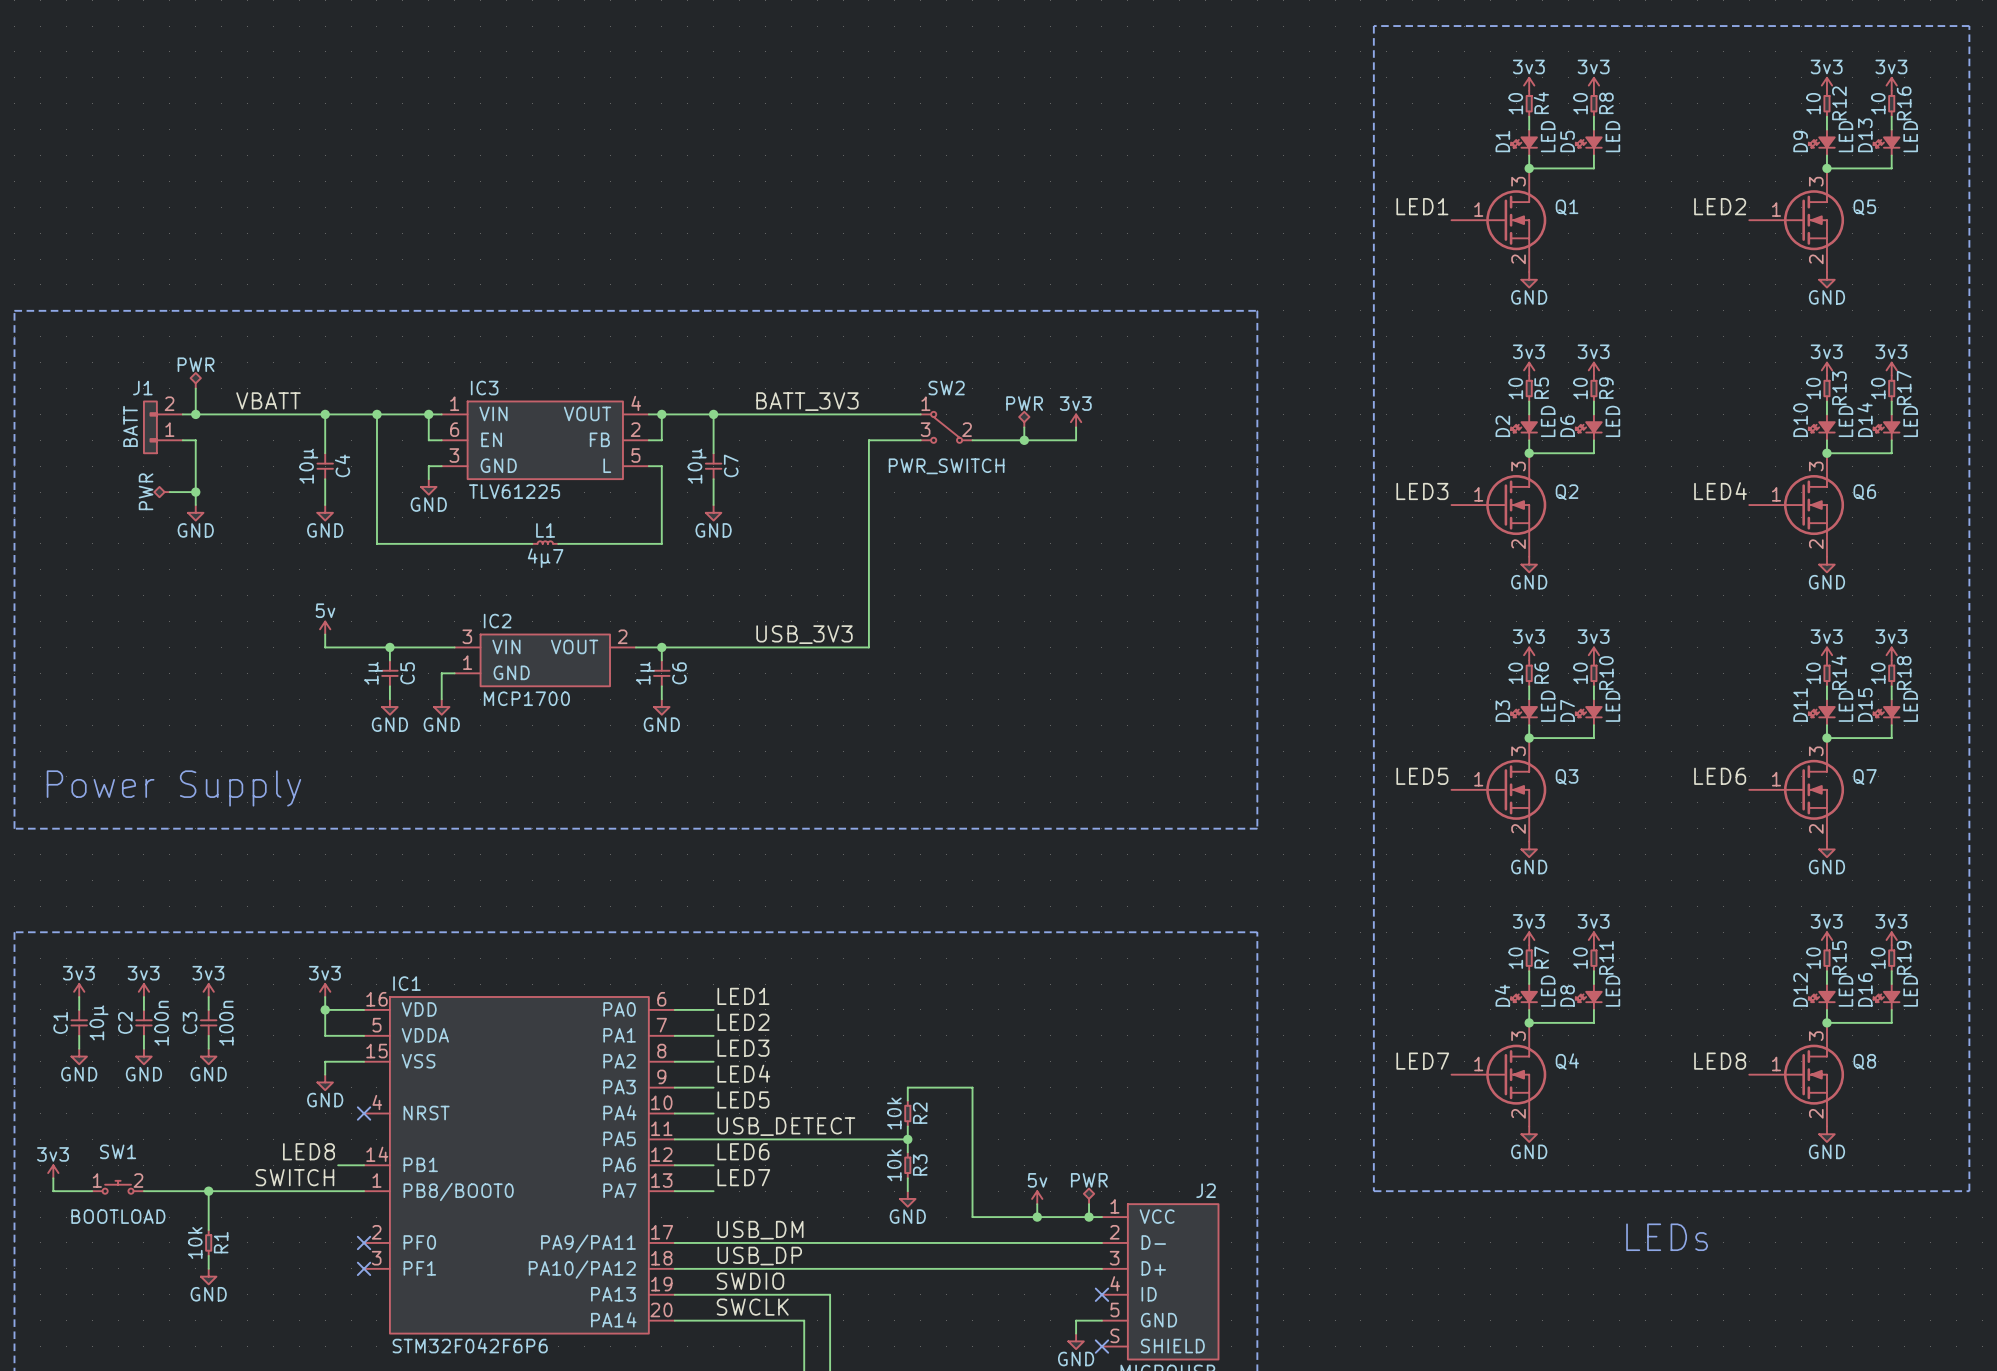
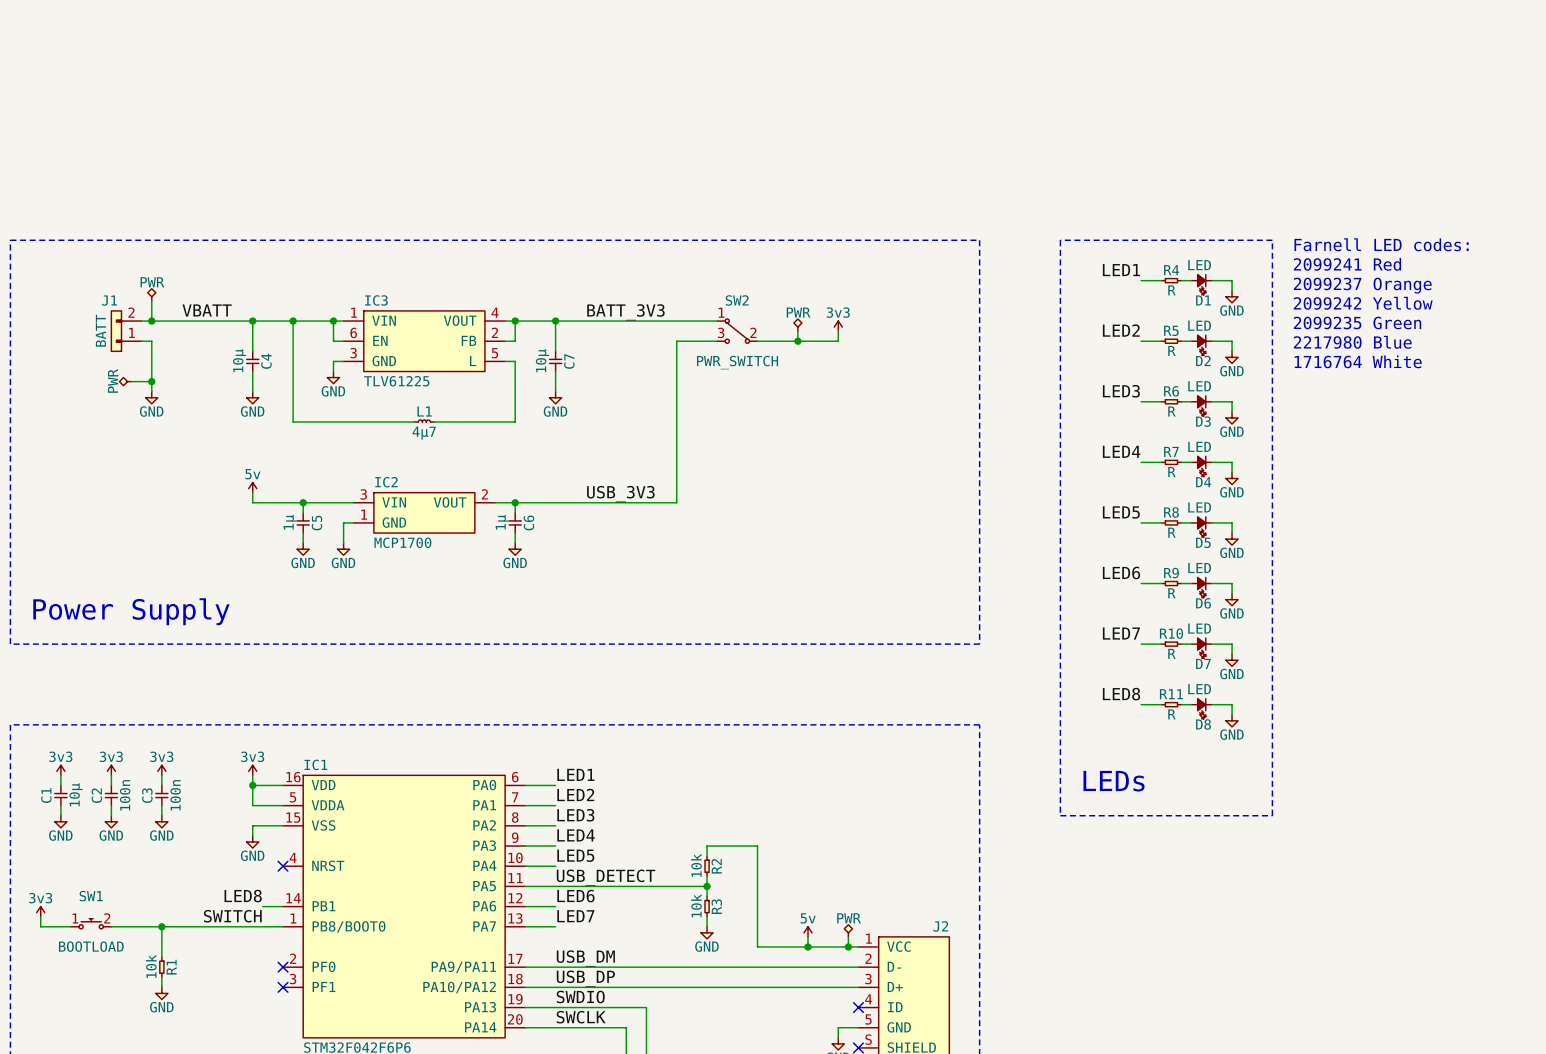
line: (1373, 26) (1969, 26) (1969, 1191) (1373, 1191) (1373, 26) -> none
power symbol: 3v3 (1529, 84) -> none
power symbol: 3v3 (1593, 84) -> none
power symbol: 3v3 (1826, 84) -> none
power symbol: 3v3 (1891, 84) -> none
R4 value: 10 (1515, 103) -> R (1171, 290)
R4 rotation: 0° (1529, 103) -> 90° clockwise (1171, 280)
R4 position: (1529, 103) -> (1171, 280)
R8 value: 10 (1580, 103) -> R (1171, 532)
R8 rotation: 0° (1593, 103) -> 90° clockwise (1171, 522)
R8 position: (1593, 103) -> (1171, 522)
R12: 10 (1826, 103) -> none
R16: 10 (1891, 103) -> none
wire: (1529, 116) (1529, 129) -> none
wire: (1593, 116) (1593, 129) -> none
wire: (1826, 116) (1826, 129) -> none
wire: (1891, 116) (1891, 129) -> none
D1 rotation: 0° (1524, 142) -> 90° counterclockwise (1201, 284)
D1 position: (1524, 142) -> (1201, 284)
D5 rotation: 0° (1588, 142) -> 90° counterclockwise (1201, 526)
D5 position: (1588, 142) -> (1201, 526)
D9: LED (1821, 142) -> none
D13: LED (1886, 142) -> none
wire: (1529, 155) (1529, 168) (1593, 168) (1593, 155) -> none
wire: (1826, 155) (1826, 168) (1891, 168) (1891, 155) -> none
junction: (1529, 168) -> none
junction: (1826, 168) -> none
label position: LED1 (1422, 206) -> LED1 (1121, 270)
label: LED2 (1720, 206) -> none
Q1: (1498, 220) -> none
Q5: (1796, 220) -> none
power symbol: GND (1529, 279) -> none
power symbol: GND (1826, 279) -> none
line: none -> (1060, 240) (1272, 240) (1272, 815) (1060, 815) (1060, 240)
text: none -> Farnell LED codes: (1381, 244)
text: none -> 2099241 Red (1347, 264)
wire: none -> (1141, 280) (1161, 280)
wire: none -> (1181, 280) (1191, 280)
wire: none -> (1211, 280) (1232, 280) (1232, 290)
power symbol: 3v3 (1529, 369) -> none
power symbol: 3v3 (1593, 369) -> none
text: none -> 2099237 Orange (1362, 285)
power symbol: 3v3 (1826, 369) -> none
power symbol: 3v3 (1891, 369) -> none
power symbol: none -> GND (1232, 296)
R5 value: 10 (1515, 388) -> R (1171, 350)
R5 rotation: 0° (1529, 388) -> 90° clockwise (1171, 341)
R5 position: (1529, 388) -> (1171, 341)
R9 value: 10 (1580, 388) -> R (1171, 593)
R9 rotation: 0° (1593, 388) -> 90° clockwise (1171, 583)
R9 position: (1593, 388) -> (1171, 583)
R13: 10 (1826, 388) -> none
R17: 10 (1891, 388) -> none
text: none -> 2099242 Yellow (1363, 303)
wire: (1529, 401) (1529, 414) -> none
wire: (1593, 401) (1593, 414) -> none
wire: (1826, 401) (1826, 414) -> none
wire: (1891, 401) (1891, 414) -> none
text: none -> 2099235 Green (1357, 322)
label: none -> LED2 (1121, 330)
D2 rotation: 0° (1524, 427) -> 90° counterclockwise (1201, 345)
D2 position: (1524, 427) -> (1201, 345)
D6 rotation: 0° (1588, 427) -> 90° counterclockwise (1201, 587)
D6 position: (1588, 427) -> (1201, 587)
D10: LED (1821, 427) -> none
D14: LED (1886, 427) -> none
wire: none -> (1141, 341) (1161, 341)
wire: (1529, 440) (1529, 453) (1593, 453) (1593, 440) -> (1191, 341) (1181, 341)
wire: none -> (1211, 341) (1232, 341) (1232, 351)
wire: (1826, 440) (1826, 453) (1891, 453) (1891, 440) -> none
text: none -> 2217980 Blue (1352, 342)
junction: (1529, 453) -> none
junction: (1826, 453) -> none
power symbol: none -> GND (1232, 357)
text: none -> 1716764 White (1358, 361)
label position: LED3 (1422, 491) -> LED3 (1121, 391)
label: LED4 (1720, 491) -> none
Q2: (1498, 505) -> none
Q6: (1796, 505) -> none
wire: none -> (1141, 401) (1161, 401)
wire: none -> (1181, 401) (1191, 401)
wire: none -> (1211, 401) (1232, 401) (1232, 411)
power symbol: none -> GND (1232, 417)
power symbol: GND (1529, 564) -> none
power symbol: GND (1826, 564) -> none
label: none -> LED4 (1121, 451)
wire: none -> (1141, 462) (1161, 462)
wire: none -> (1181, 462) (1191, 462)
wire: none -> (1211, 462) (1232, 462) (1232, 472)
power symbol: none -> GND (1232, 478)
power symbol: 3v3 (1529, 653) -> none
power symbol: 3v3 (1593, 653) -> none
power symbol: 3v3 (1826, 653) -> none
power symbol: 3v3 (1891, 653) -> none
wire: none -> (1141, 522) (1161, 522)
R6 value: 10 (1515, 673) -> R (1171, 411)
wire: none -> (1181, 522) (1191, 522)
R6 rotation: 0° (1529, 673) -> 90° clockwise (1171, 401)
R6 position: (1529, 673) -> (1171, 401)
wire: none -> (1211, 522) (1232, 522) (1232, 533)
R10 value: 10 (1580, 673) -> R (1171, 653)
R10 rotation: 0° (1593, 673) -> 90° clockwise (1171, 644)
R10 position: (1593, 673) -> (1171, 644)
R14: 10 (1826, 673) -> none
R18: 10 (1891, 673) -> none
wire: (1529, 686) (1529, 699) -> none
wire: (1593, 686) (1593, 699) -> none
wire: (1826, 686) (1826, 699) -> none
wire: (1891, 686) (1891, 699) -> none
power symbol: none -> GND (1232, 539)
D3 rotation: 0° (1524, 712) -> 90° counterclockwise (1201, 405)
D3 position: (1524, 712) -> (1201, 405)
D7 rotation: 0° (1588, 712) -> 90° counterclockwise (1201, 648)
D7 position: (1588, 712) -> (1201, 648)
D11: LED (1821, 712) -> none
D15: LED (1886, 712) -> none
wire: (1529, 725) (1529, 738) (1593, 738) (1593, 725) -> none
wire: (1826, 725) (1826, 738) (1891, 738) (1891, 725) -> none
label: none -> LED6 (1121, 572)
junction: (1529, 738) -> none
junction: (1826, 738) -> none
wire: none -> (1141, 583) (1161, 583)
wire: none -> (1181, 583) (1191, 583)
wire: none -> (1211, 583) (1232, 583) (1232, 593)
power symbol: none -> GND (1232, 599)
label position: LED5 (1422, 776) -> LED5 (1121, 512)
label: LED6 (1720, 776) -> none
Q3: (1498, 789) -> none
Q7: (1796, 789) -> none
wire: none -> (1141, 644) (1161, 644)
wire: none -> (1181, 644) (1191, 644)
wire: none -> (1211, 644) (1232, 644) (1232, 654)
power symbol: GND (1529, 849) -> none
power symbol: none -> GND (1232, 660)
power symbol: GND (1826, 849) -> none
label: none -> LED8 (1121, 694)
wire: none -> (1141, 704) (1161, 704)
wire: none -> (1181, 704) (1191, 704)
wire: none -> (1211, 704) (1232, 704) (1232, 714)
power symbol: none -> GND (1232, 720)
power symbol: 3v3 (1529, 938) -> none
power symbol: 3v3 (1593, 938) -> none
power symbol: 3v3 (1826, 938) -> none
power symbol: 3v3 (1891, 938) -> none
R7 value: 10 (1515, 958) -> R (1171, 472)
R7 rotation: 0° (1529, 958) -> 90° clockwise (1171, 462)
R7 position: (1529, 958) -> (1171, 462)
R11 value: 10 (1580, 958) -> R (1171, 714)
R11 rotation: 0° (1593, 958) -> 90° clockwise (1171, 704)
R11 position: (1593, 958) -> (1171, 704)
R15: 10 (1826, 958) -> none
R19: 10 (1891, 958) -> none
wire: (1529, 971) (1529, 984) -> none
wire: (1593, 971) (1593, 984) -> none
wire: (1826, 971) (1826, 984) -> none
wire: (1891, 971) (1891, 984) -> none
D4 rotation: 0° (1524, 996) -> 90° counterclockwise (1201, 466)
D4 position: (1524, 996) -> (1201, 466)
D8 rotation: 0° (1588, 996) -> 90° counterclockwise (1201, 708)
D8 position: (1588, 996) -> (1201, 708)
D12: LED (1821, 996) -> none
D16: LED (1886, 996) -> none
text: none -> LEDs (1114, 781)
wire: (1529, 1009) (1529, 1022) (1593, 1022) (1593, 1009) -> none
wire: (1826, 1009) (1826, 1022) (1891, 1022) (1891, 1009) -> none
junction: (1529, 1022) -> none
junction: (1826, 1022) -> none
label position: LED7 (1422, 1061) -> LED7 (1121, 633)
label: LED8 (1720, 1061) -> none
Q4: (1498, 1074) -> none
Q8: (1796, 1074) -> none
power symbol: GND (1529, 1134) -> none
power symbol: GND (1826, 1134) -> none
text: LEDs (1667, 1237) -> none

